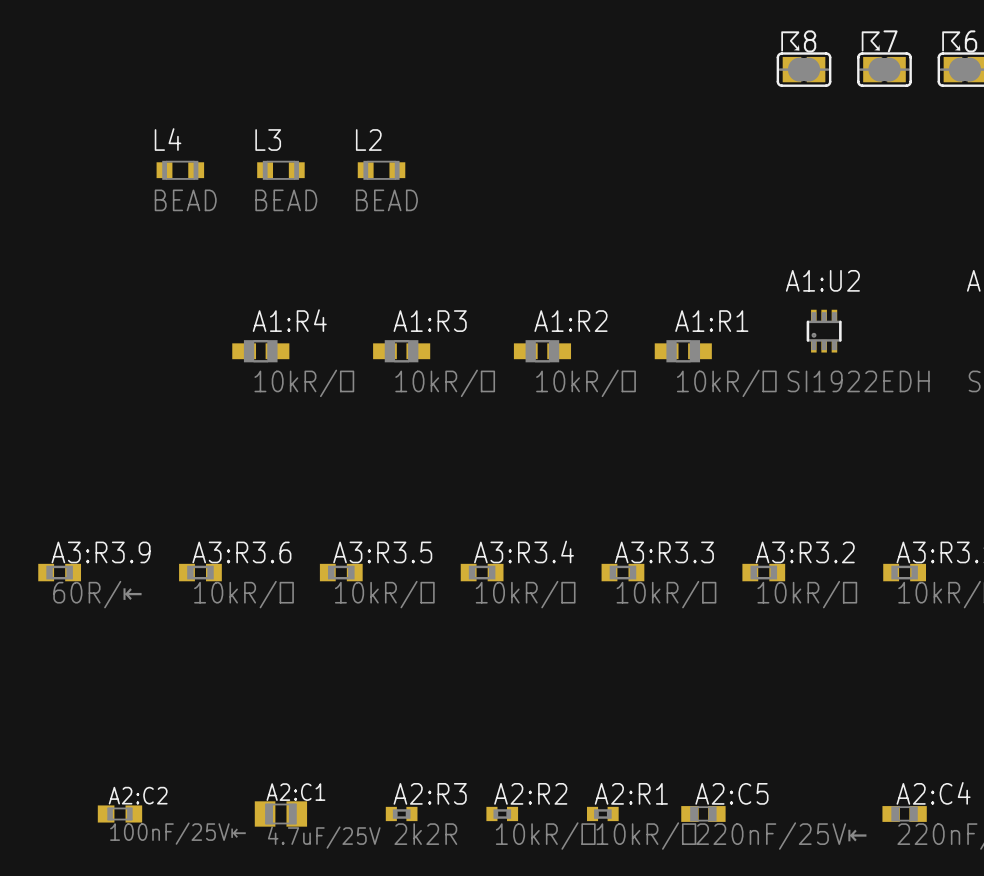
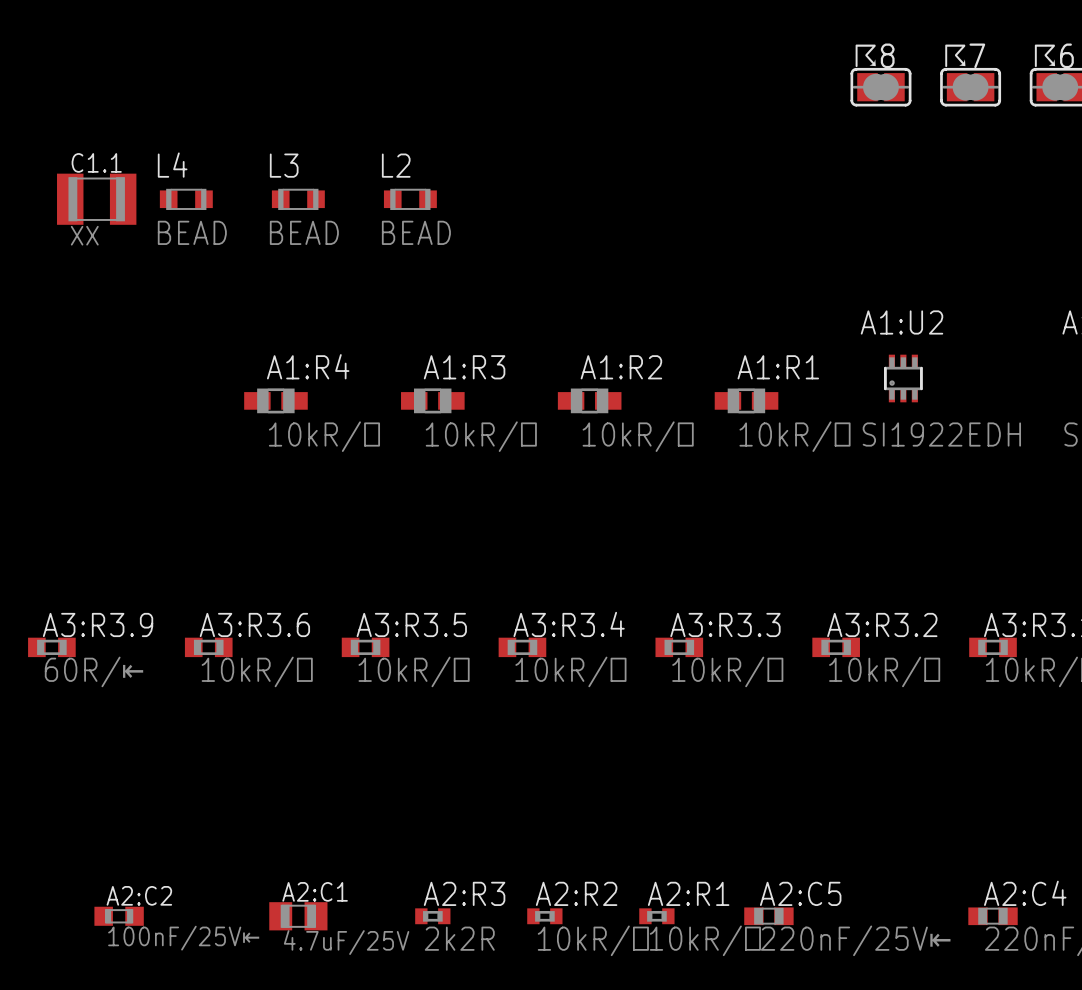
C1.1: none -> XX (96, 199)

